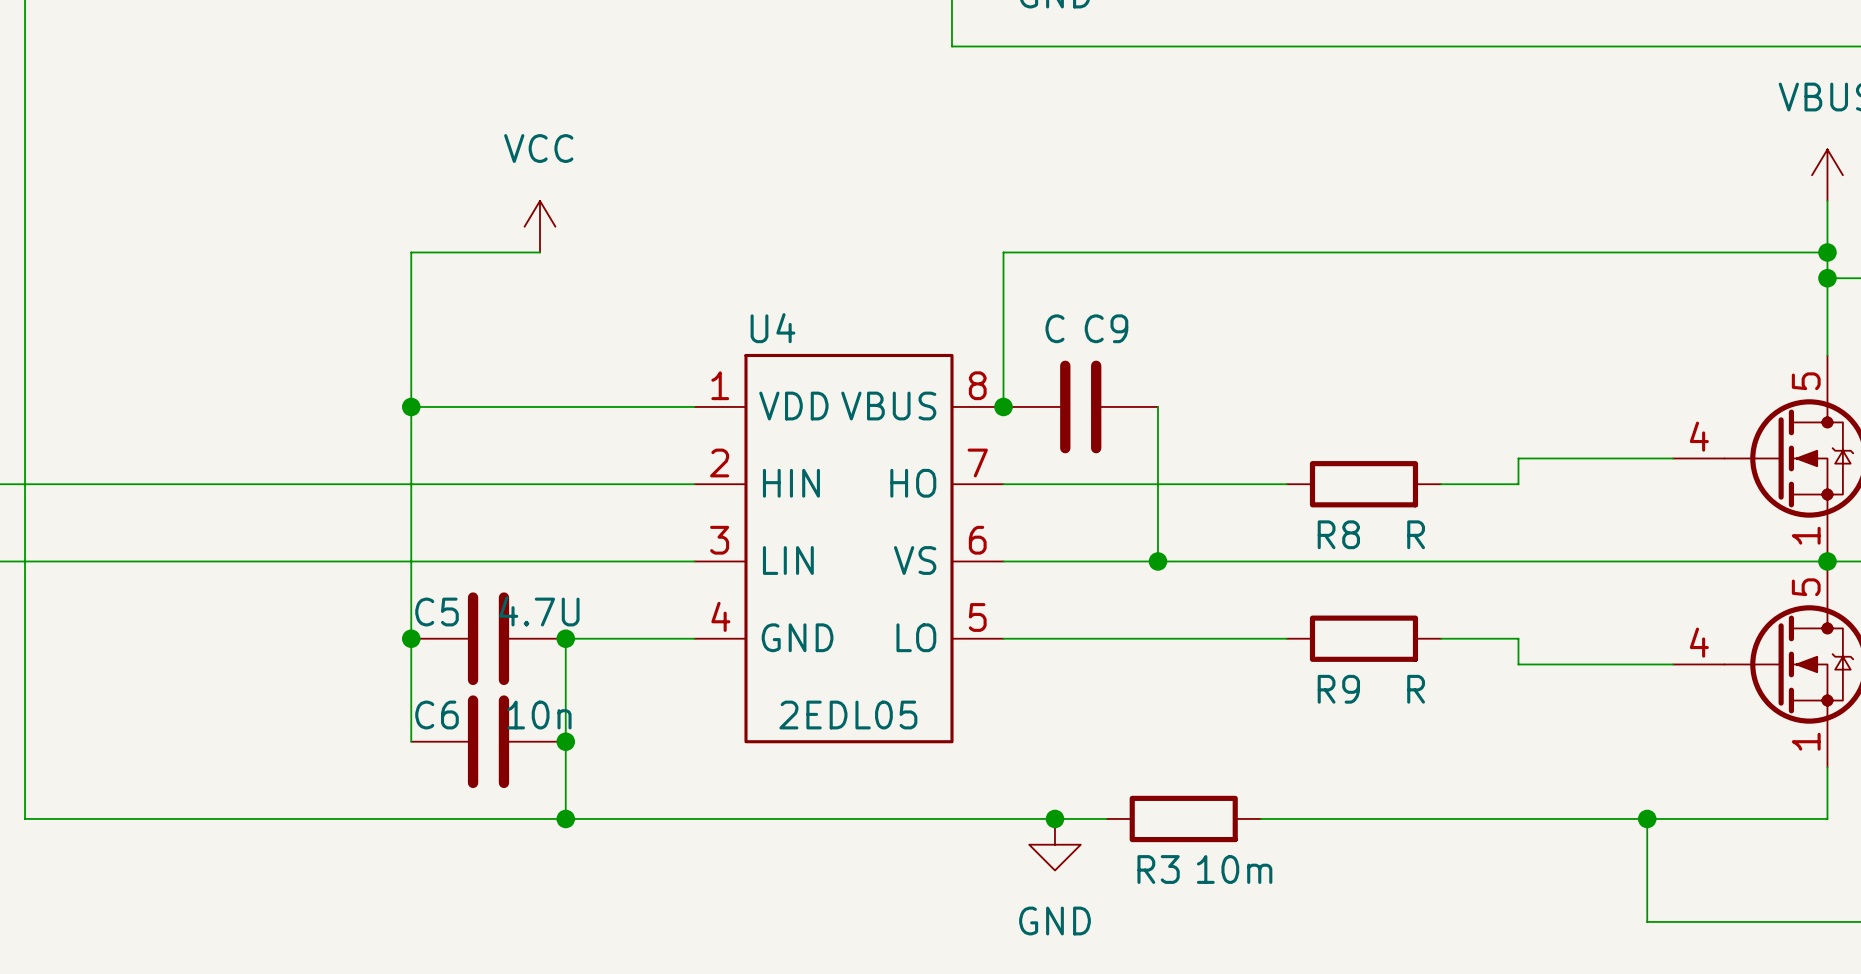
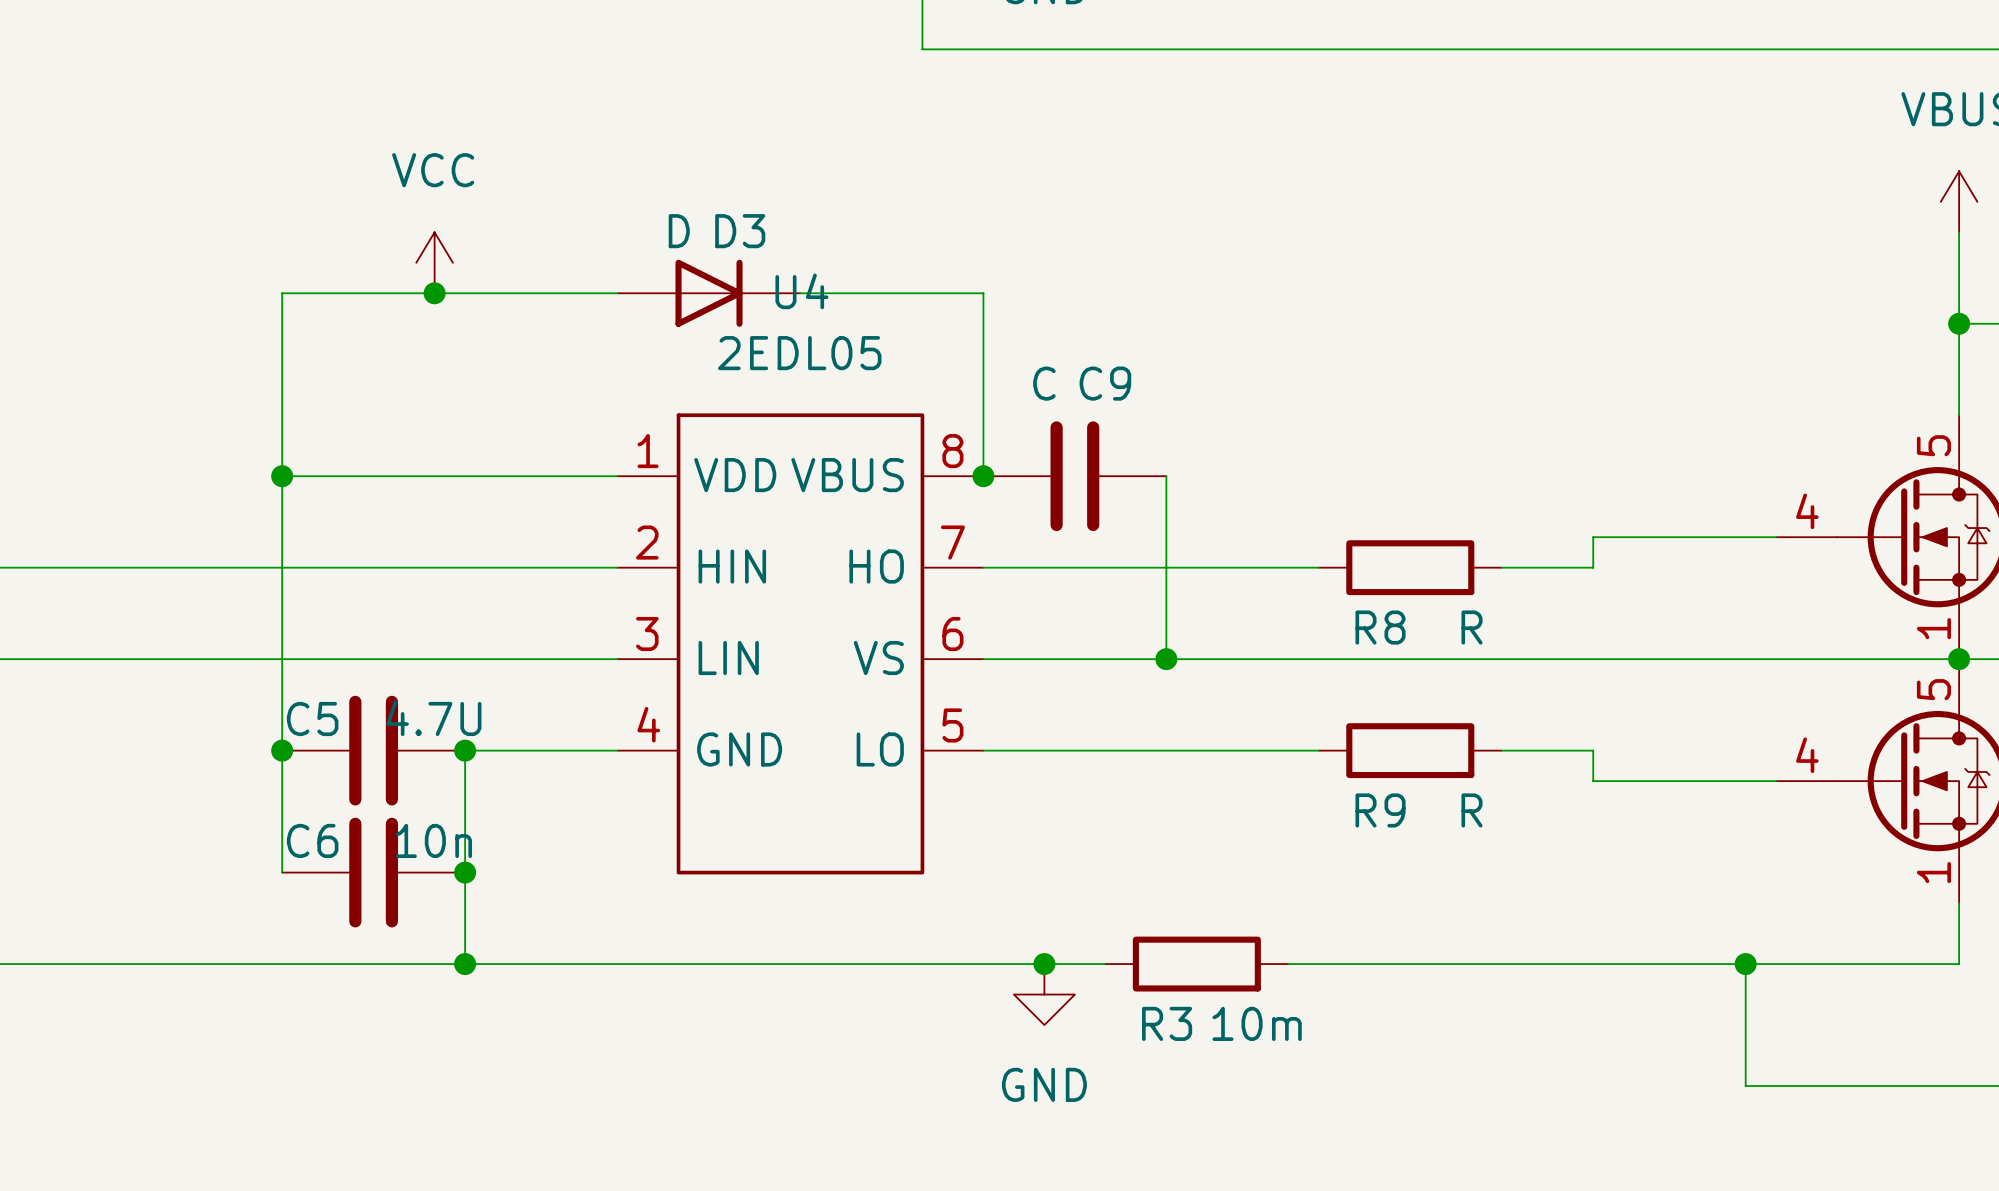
wire: none -> (434, 293) (617, 293)
junction: none -> (434, 293)
D3: none -> D (709, 293)
wire: (1003, 252) (1827, 252) -> (983, 293) (800, 293)
junction: (1827, 252) -> none
U4 name position: U4 (772, 328) -> U4 (801, 291)
U4 value position: 2EDL05 (848, 715) -> 2EDL05 (799, 353)

